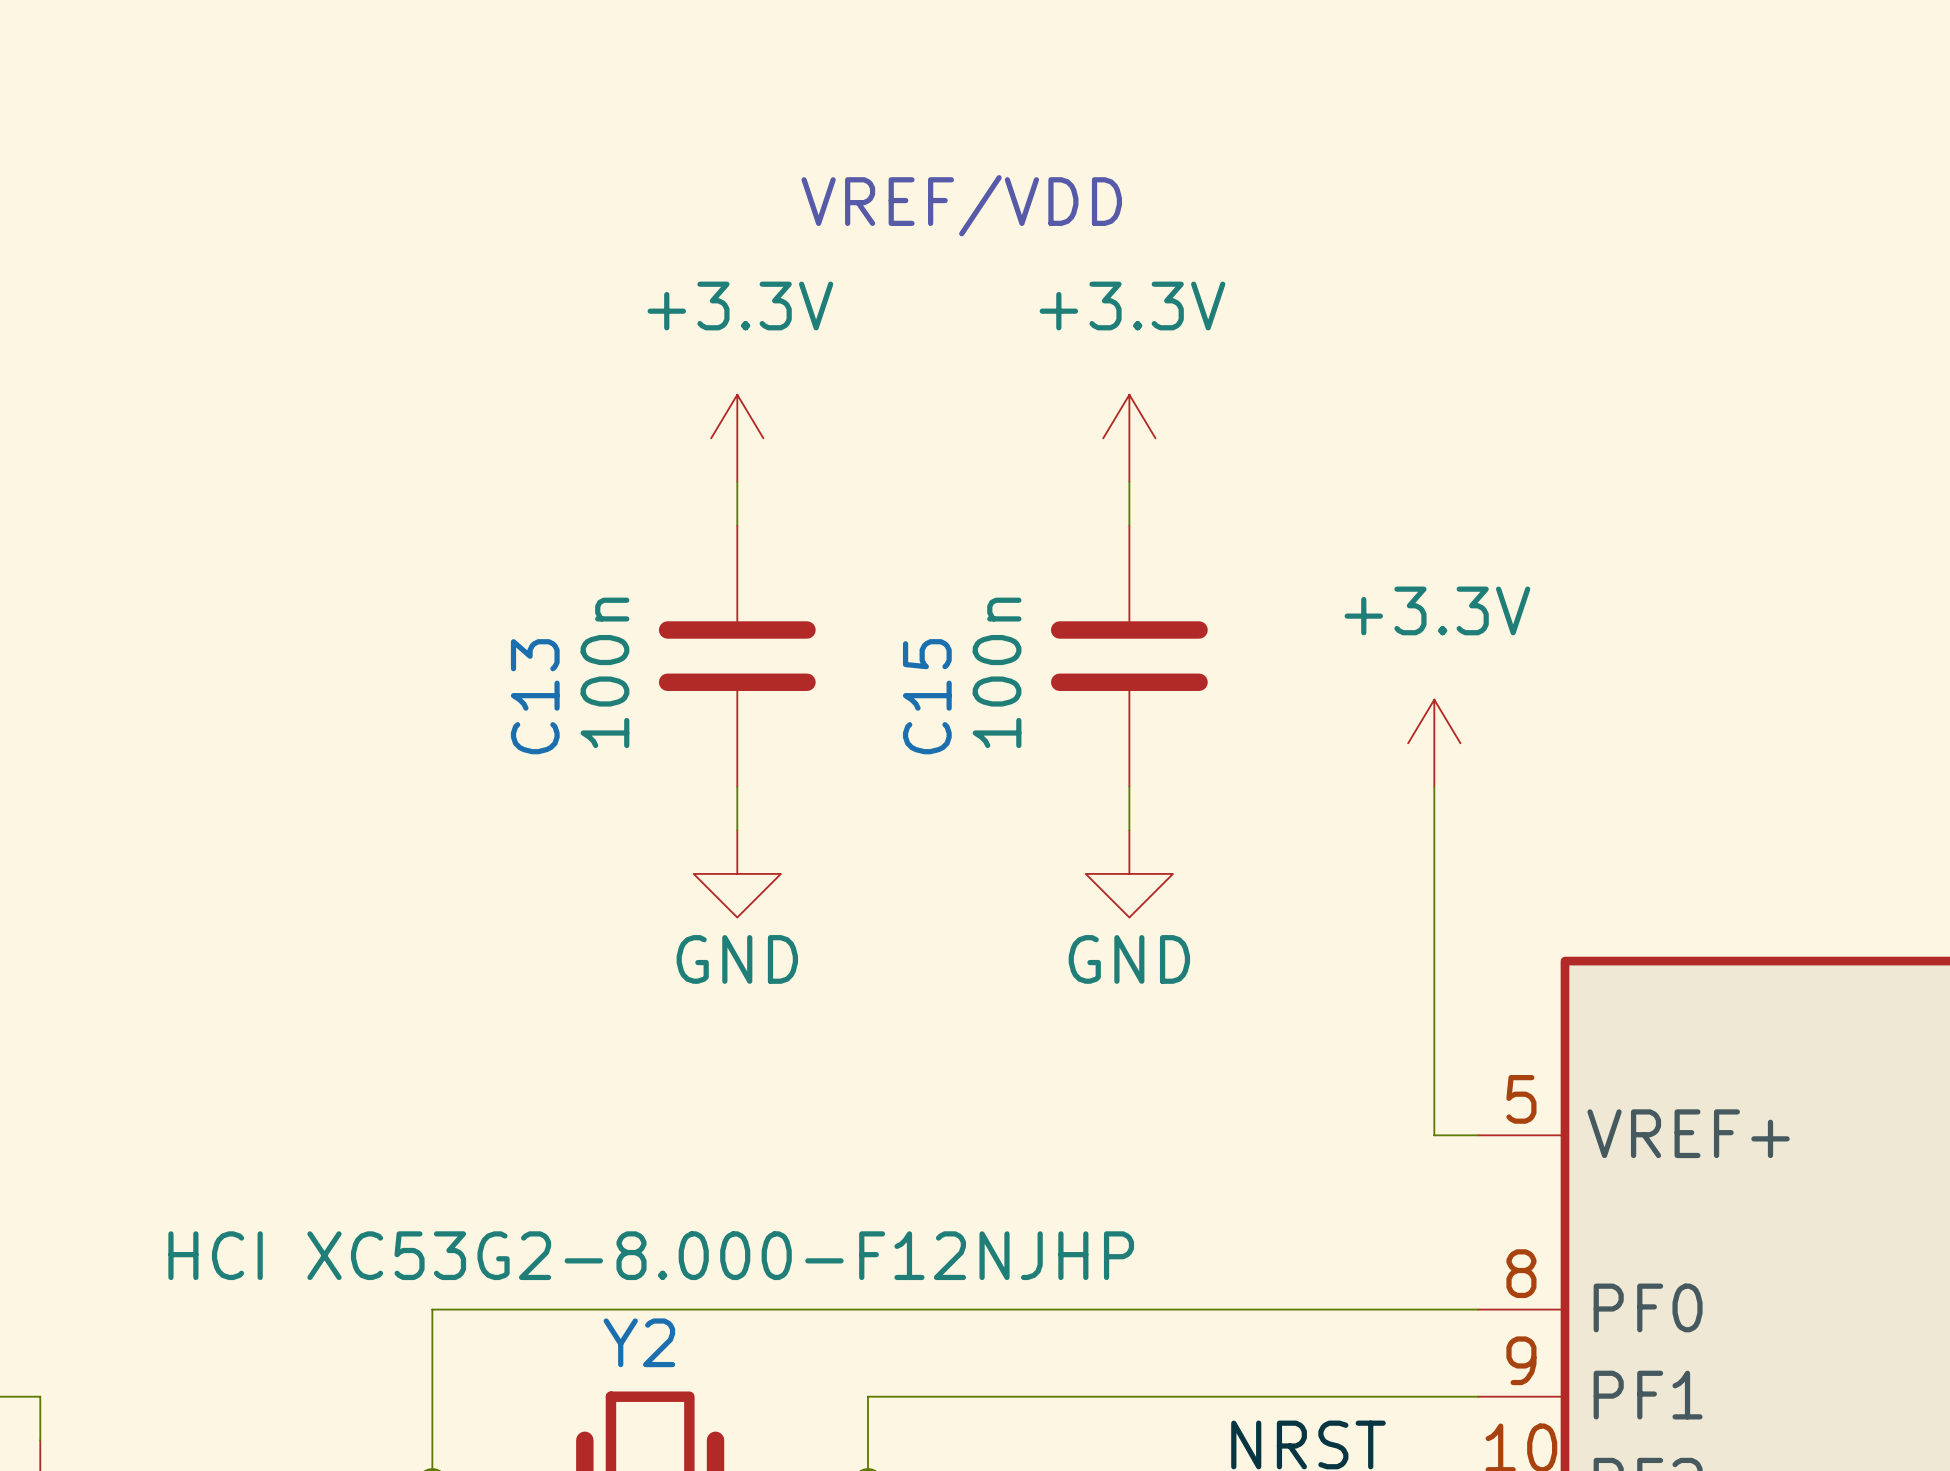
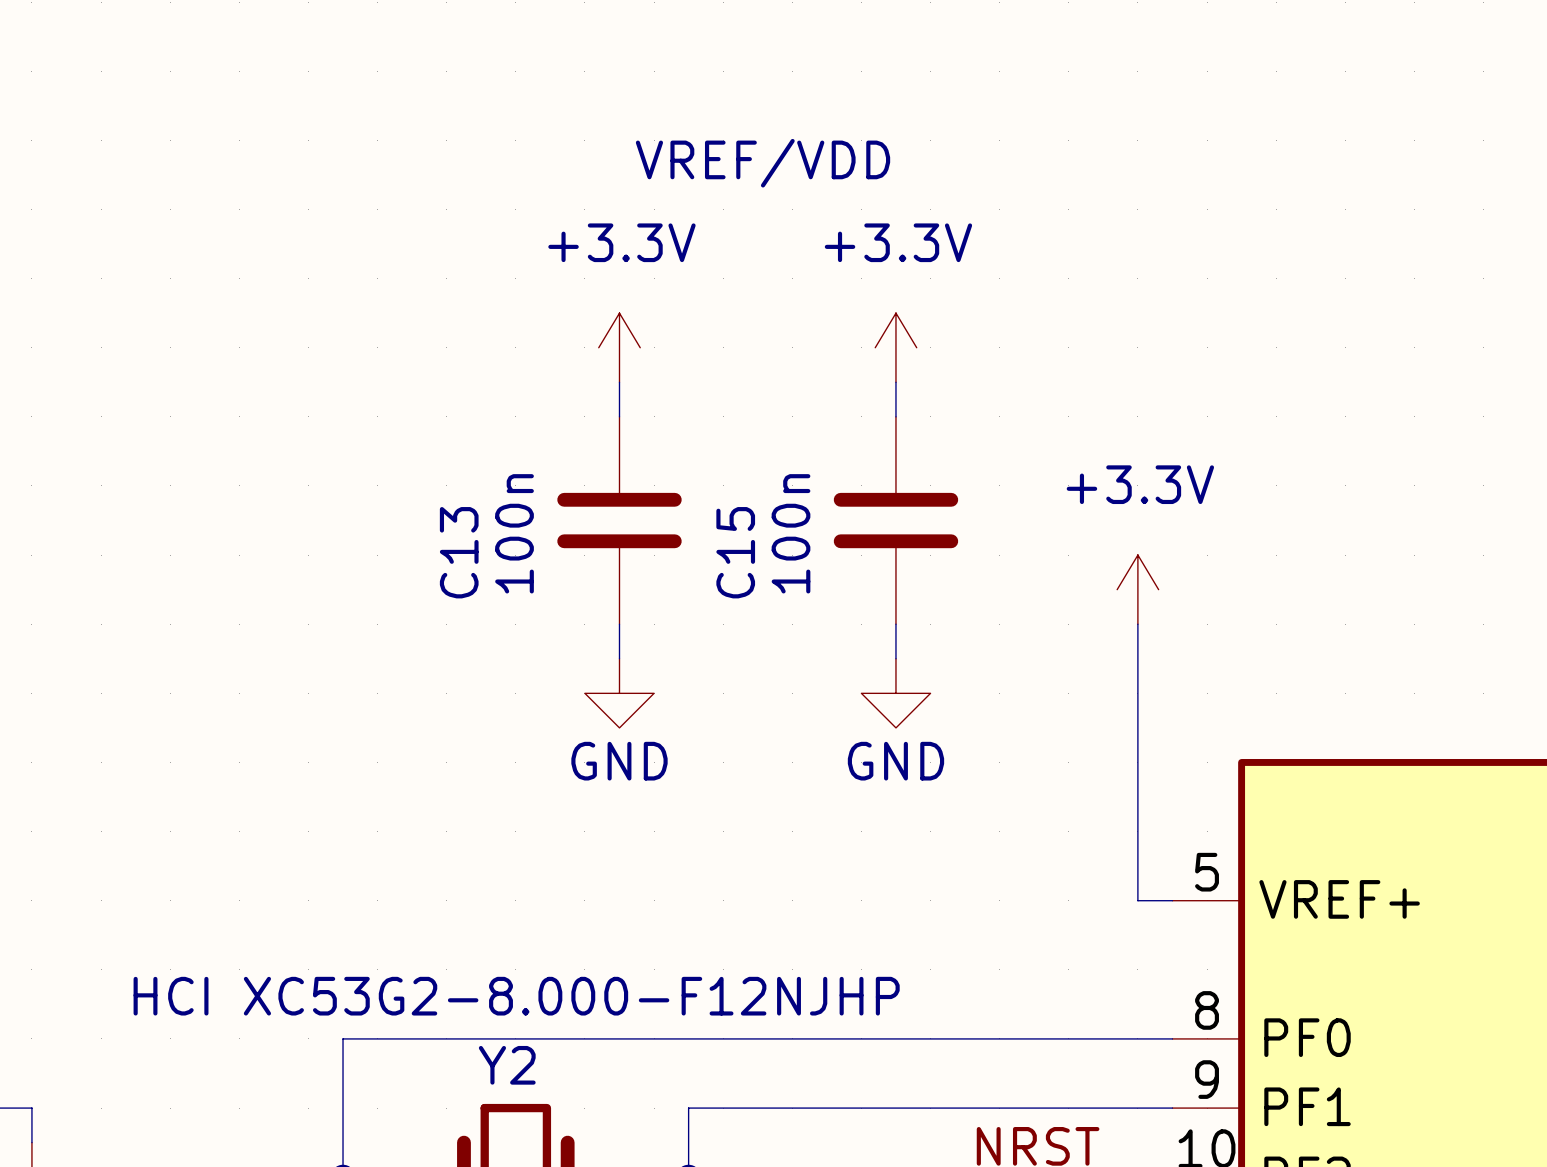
power symbol position: +3.3V (737, 438) -> +3.3V (619, 347)
wire: (737, 481) (737, 525) -> (619, 382) (619, 416)
C13 position: (737, 656) -> (619, 520)
wire: (737, 786) (737, 830) -> (619, 624) (619, 658)
power symbol position: GND (737, 873) -> GND (619, 693)

